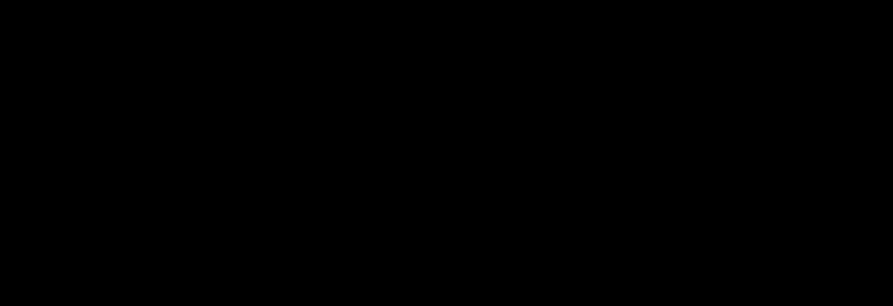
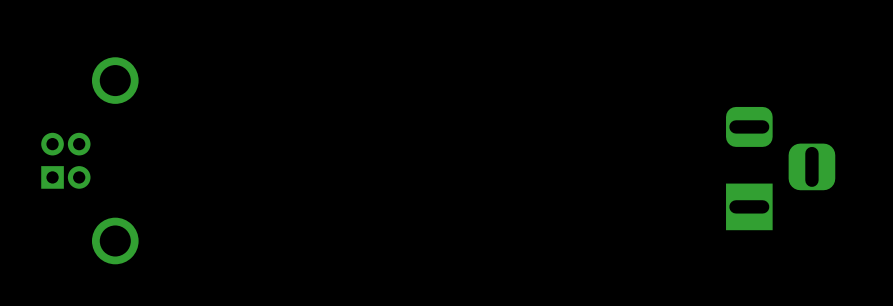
part: none -> (89, 160)
part: none -> (780, 168)

